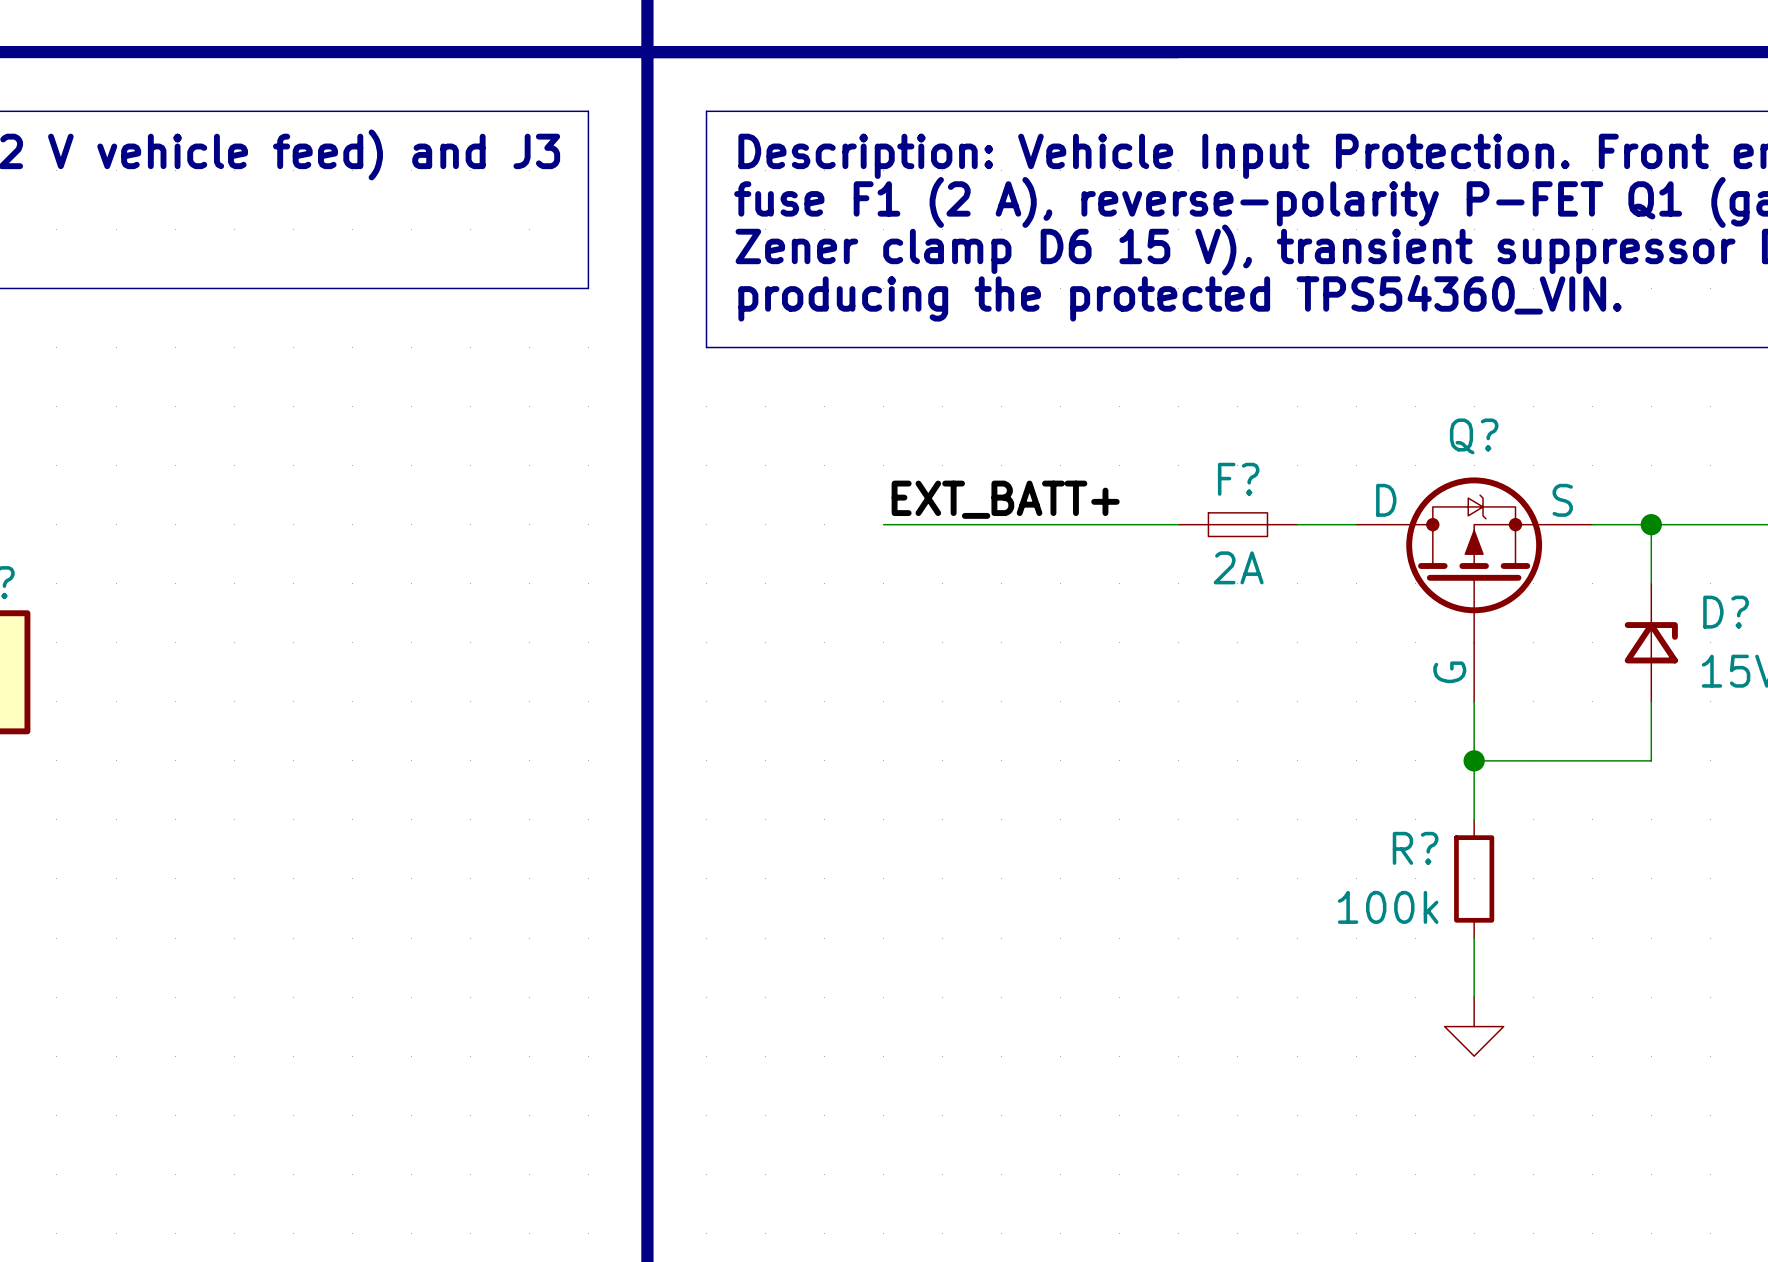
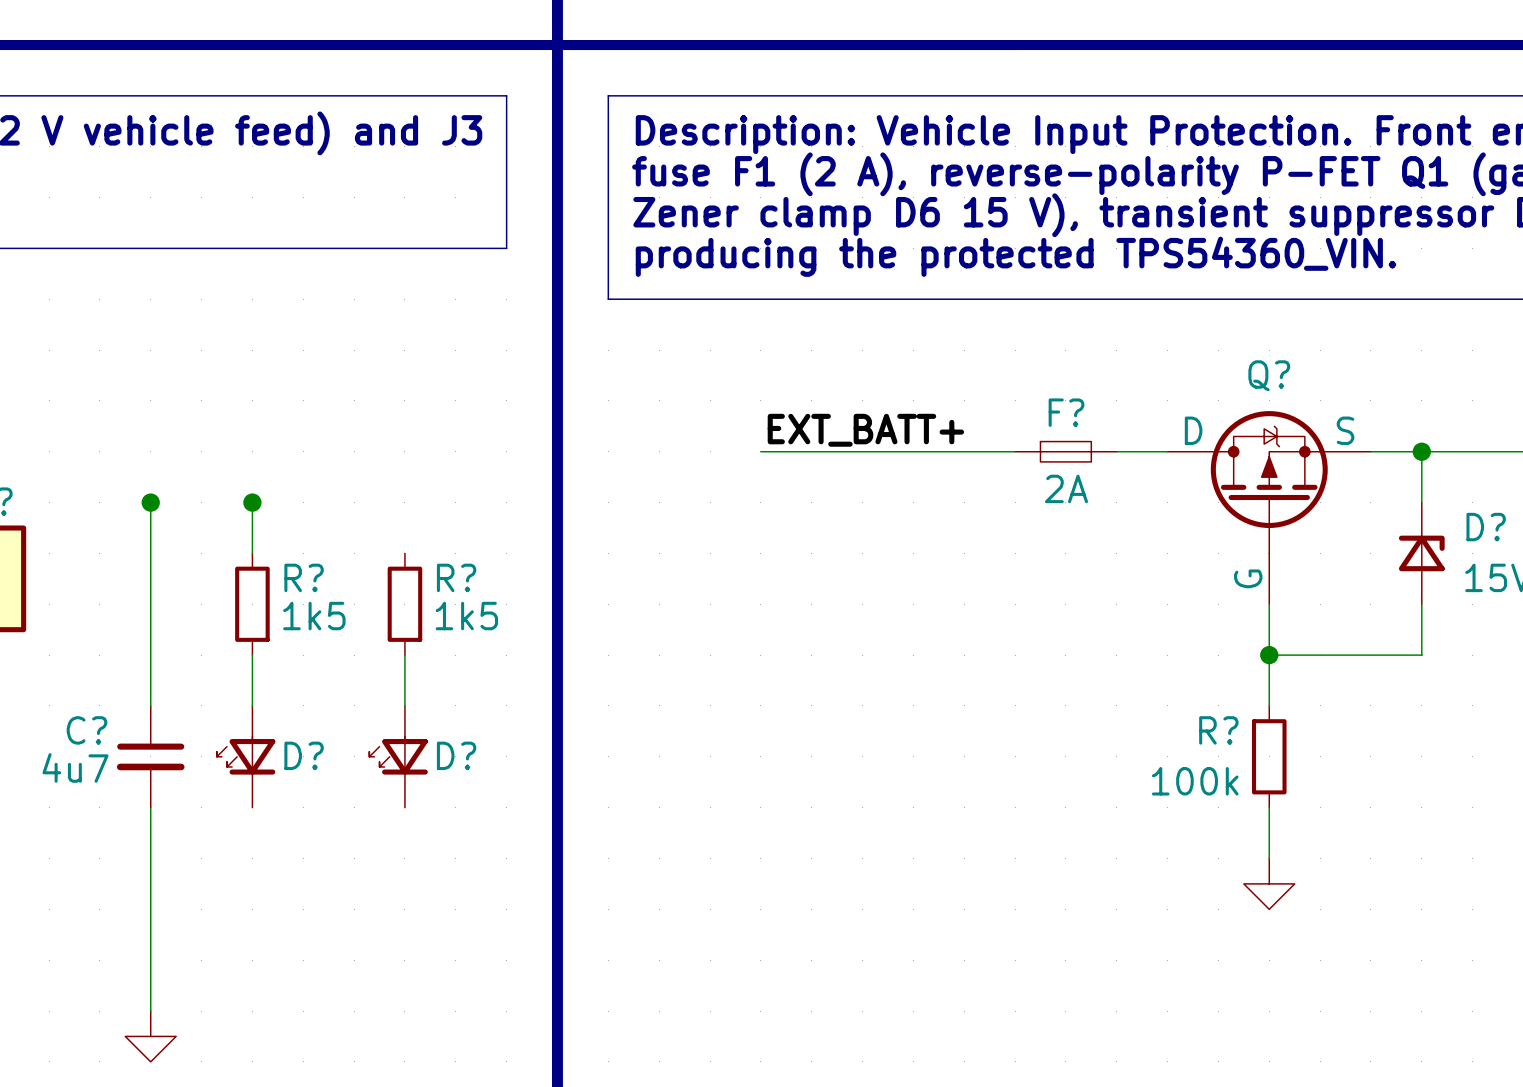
wire: none -> (150, 502) (150, 705)
junction: none -> (150, 502)
wire: none -> (252, 502) (252, 553)
junction: none -> (252, 502)
R?: none -> 1k5 (252, 604)
R?: none -> 1k5 (404, 604)
wire: none -> (252, 655) (252, 705)
wire: none -> (404, 655) (404, 705)
C?: none -> 4u7 (150, 756)
D?: none -> (246, 756)
D?: none -> (398, 756)
wire: none -> (150, 807) (150, 1011)
power symbol: none -> (150, 1036)

